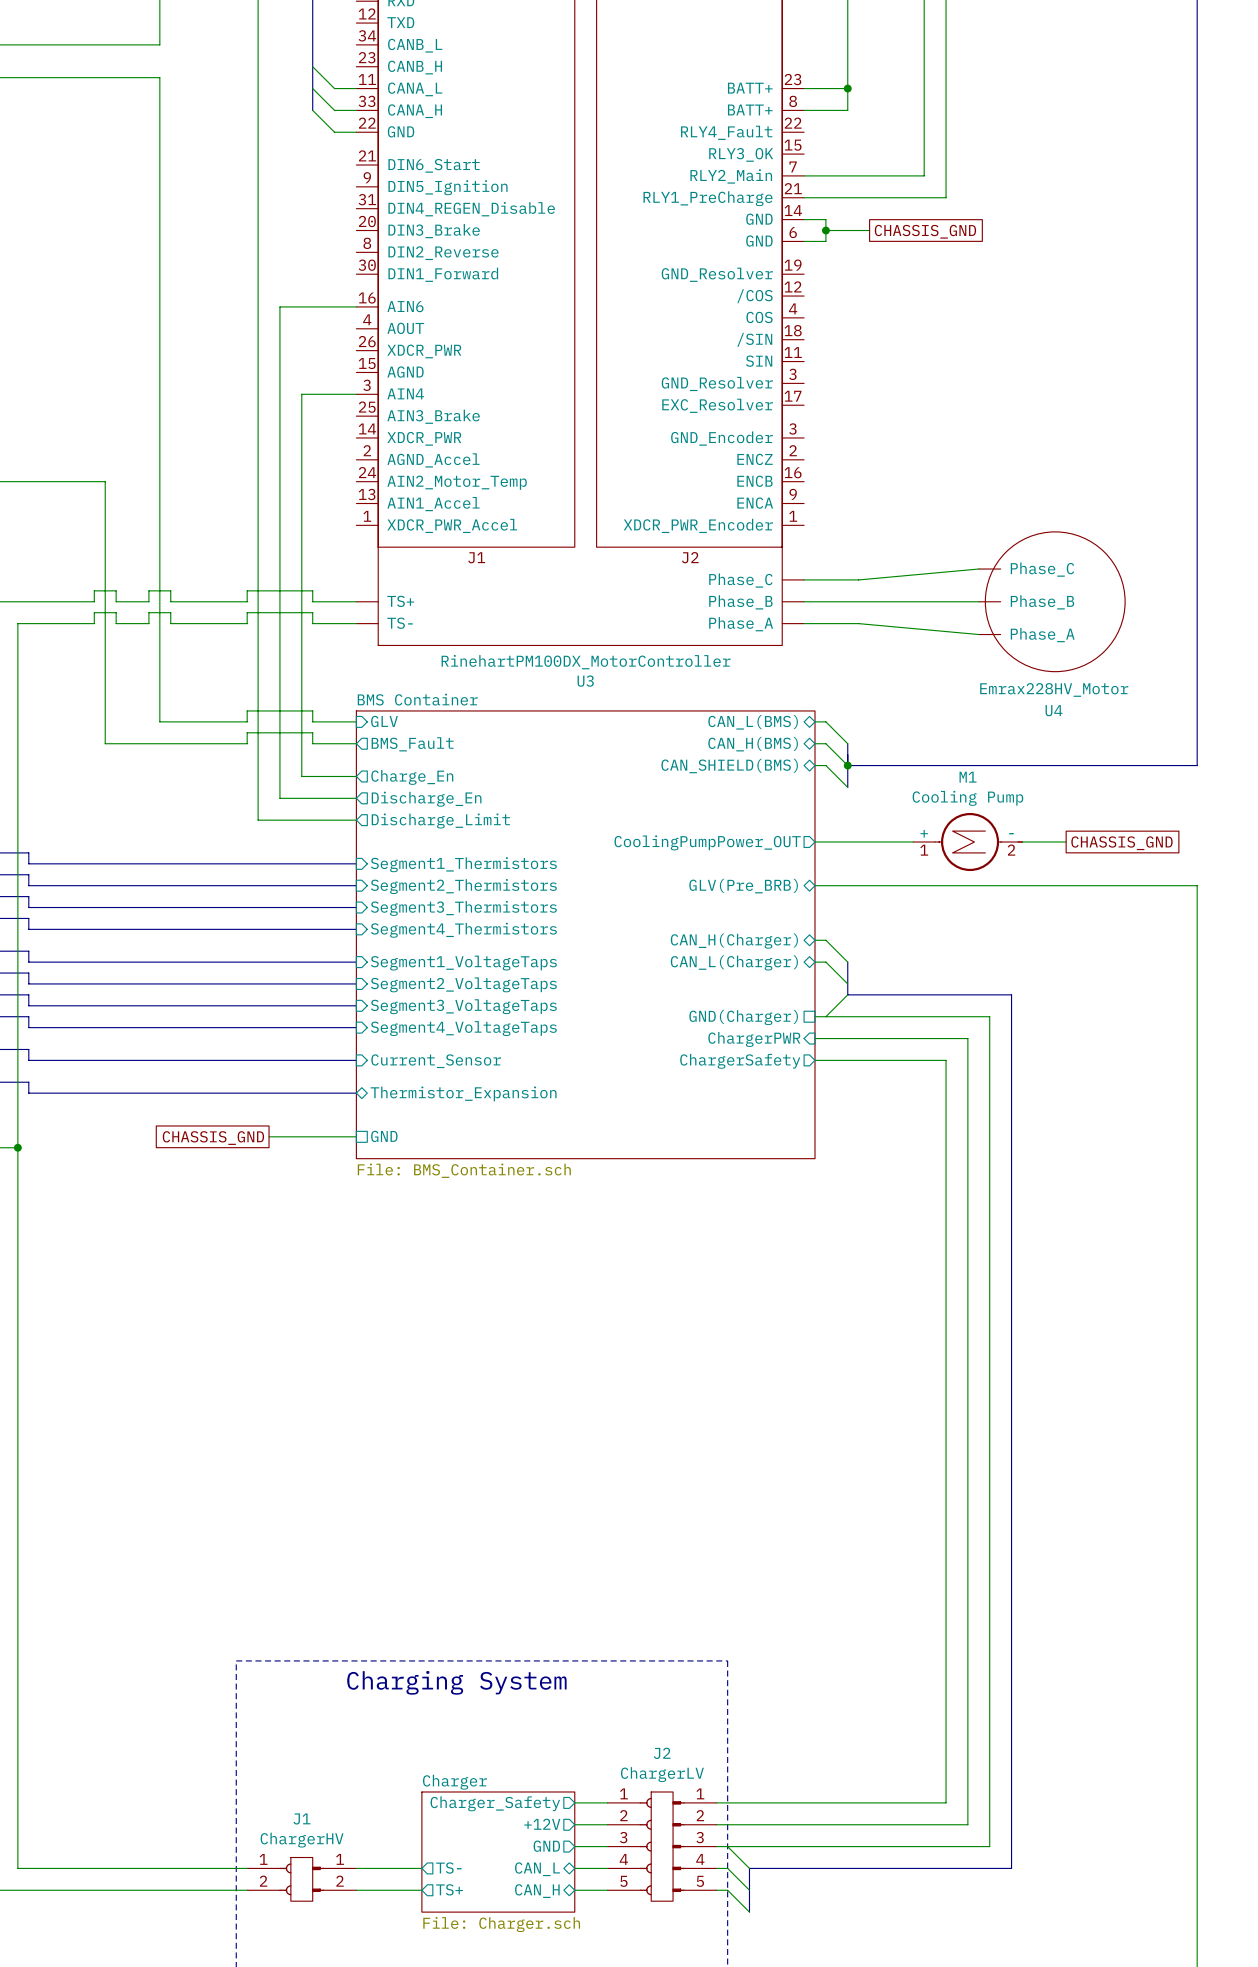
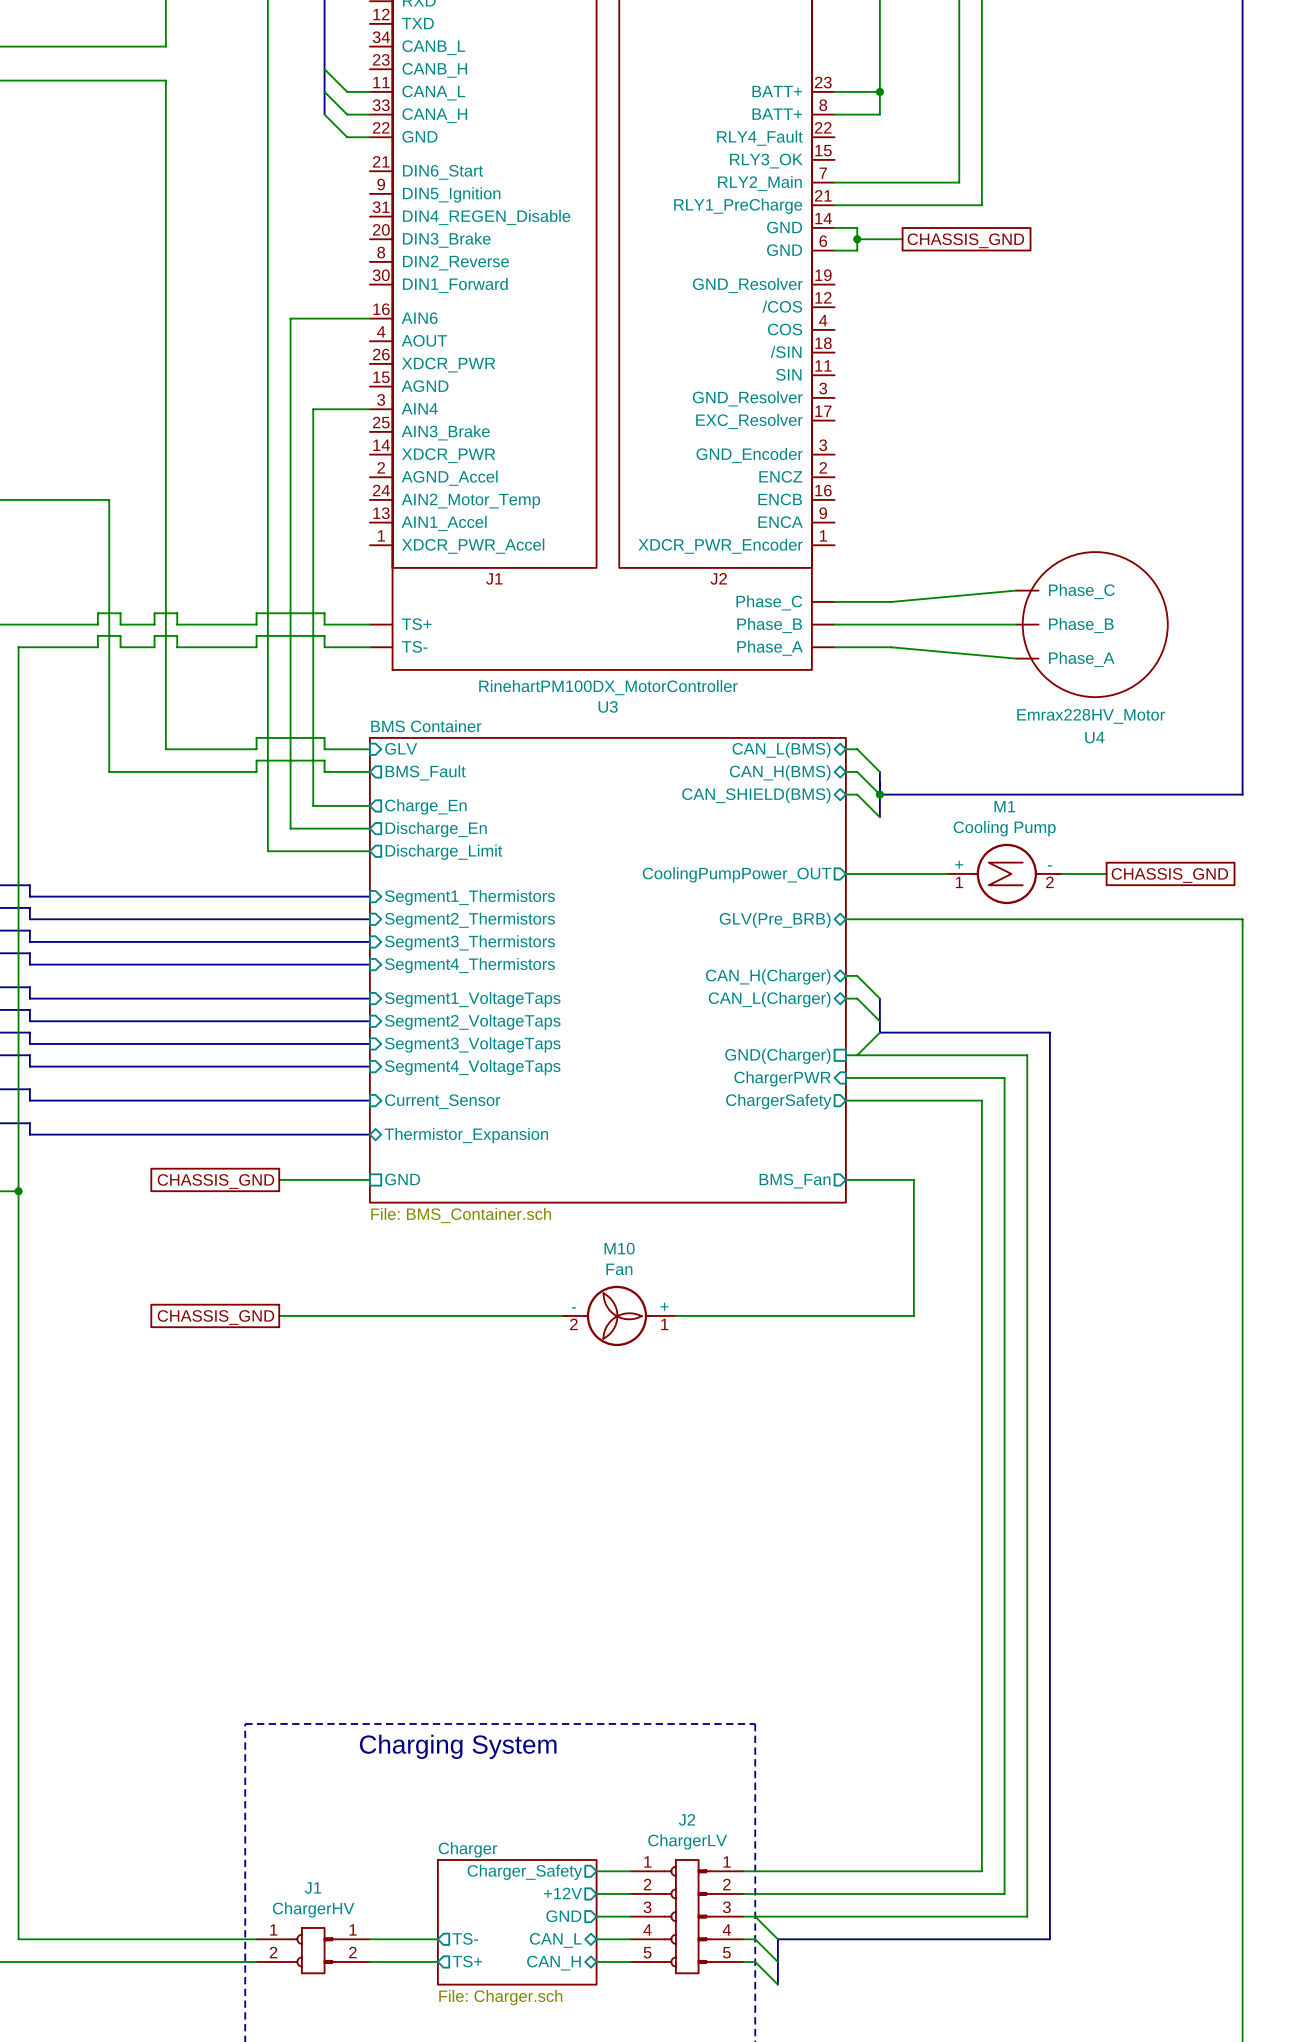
wire: none -> (845, 1179) (913, 1179) (913, 1315) (675, 1315)
sheet pin: none -> BMS_Fan (795, 1181)
wire: none -> (279, 1315) (562, 1315)
M10: none -> Fan (619, 1315)
global label: none -> CHASSIS_GND (215, 1317)

